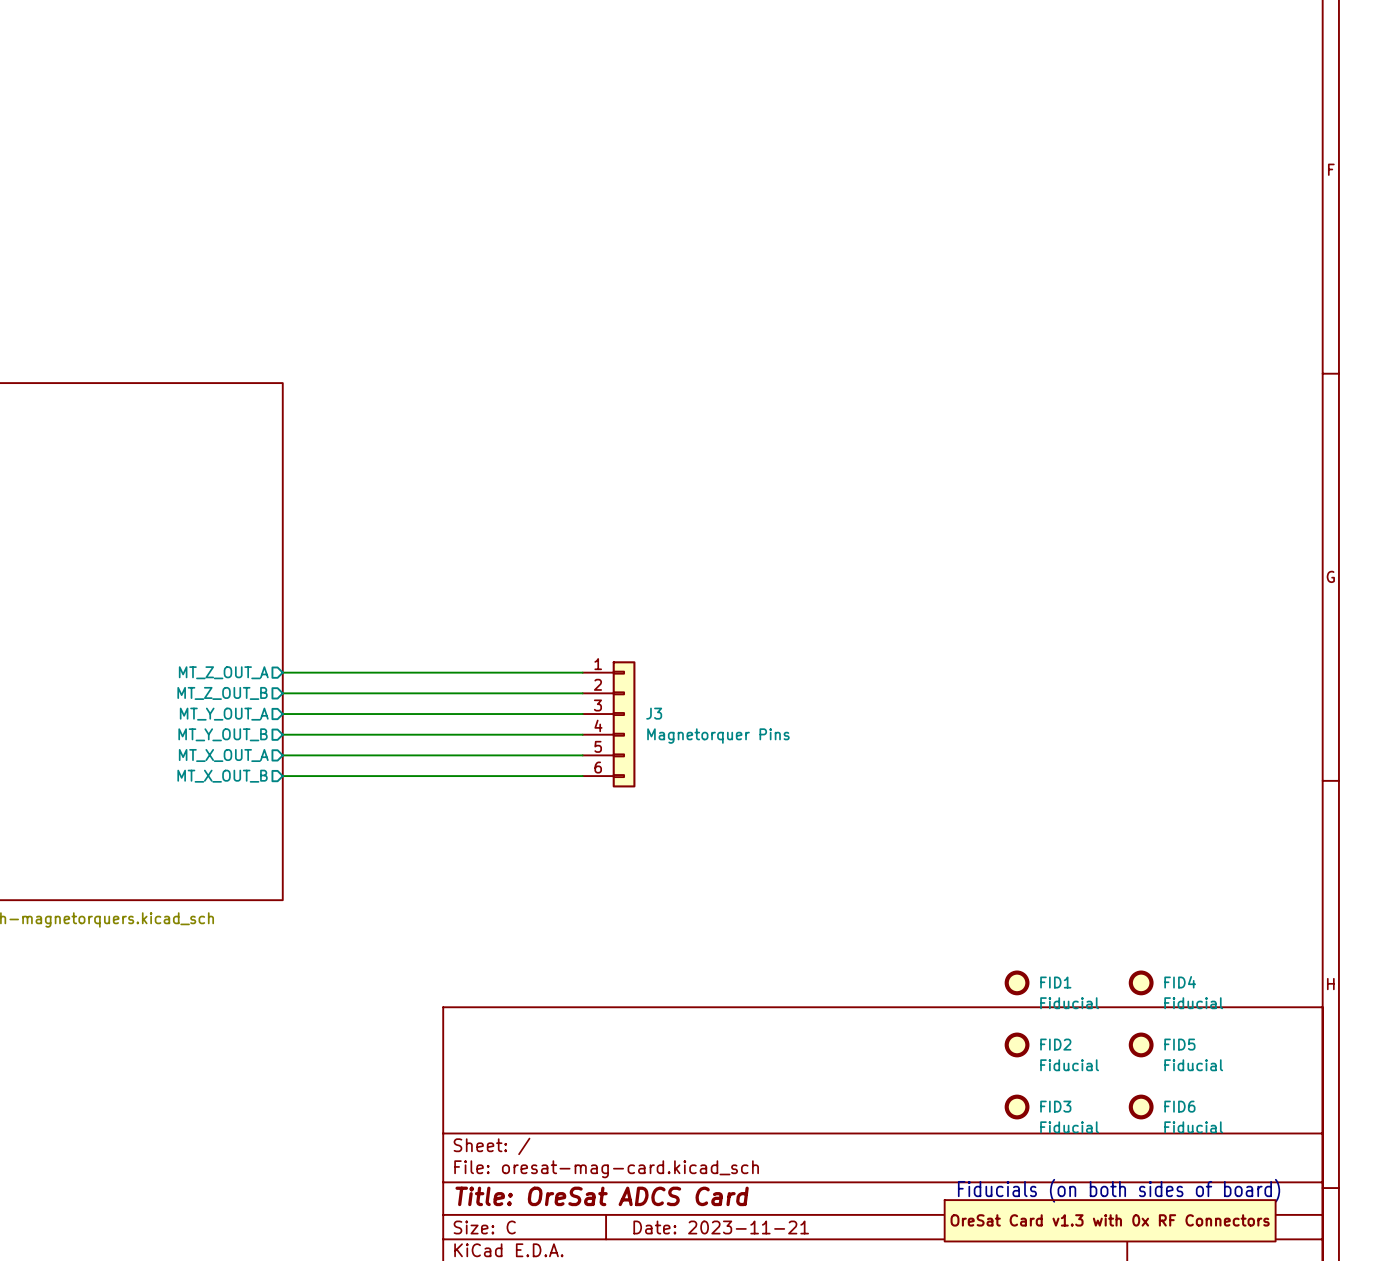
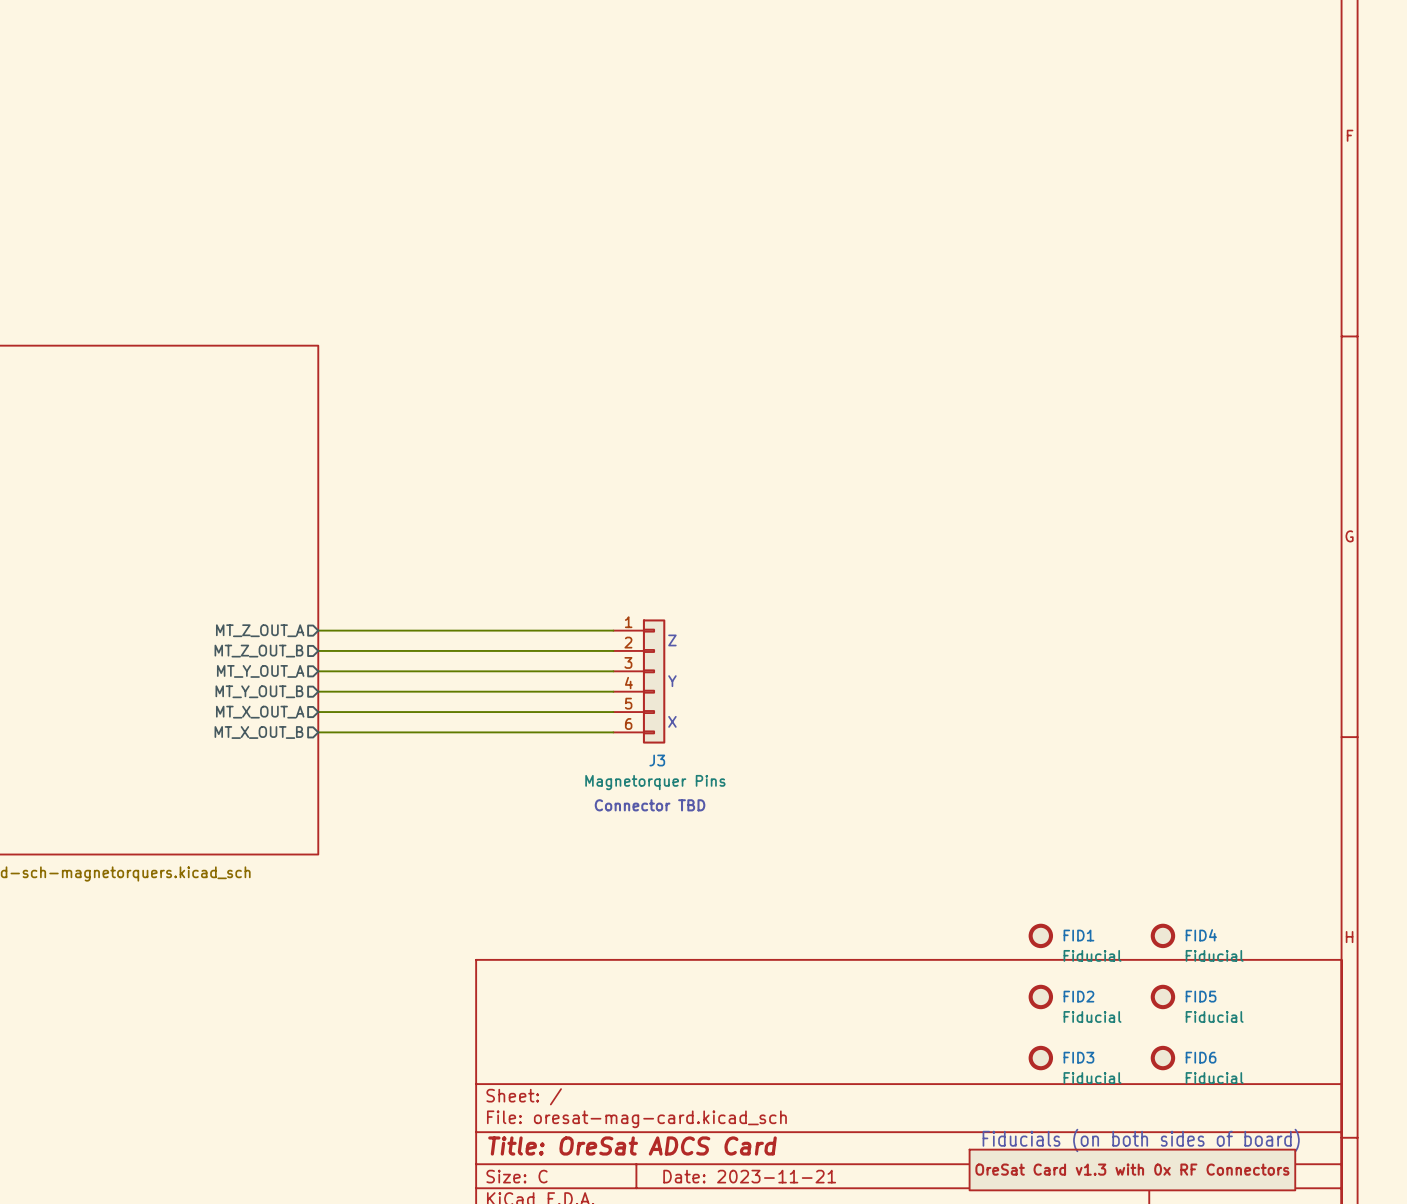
text: none -> Z (672, 640)
J3 name position: J3 (654, 713) -> J3 (657, 760)
text: none -> Y (672, 681)
J3 value position: Magnetorquer Pins (718, 736) -> Magnetorquer Pins (655, 782)
text: none -> X (672, 721)
text: none -> Connector TBD (650, 805)

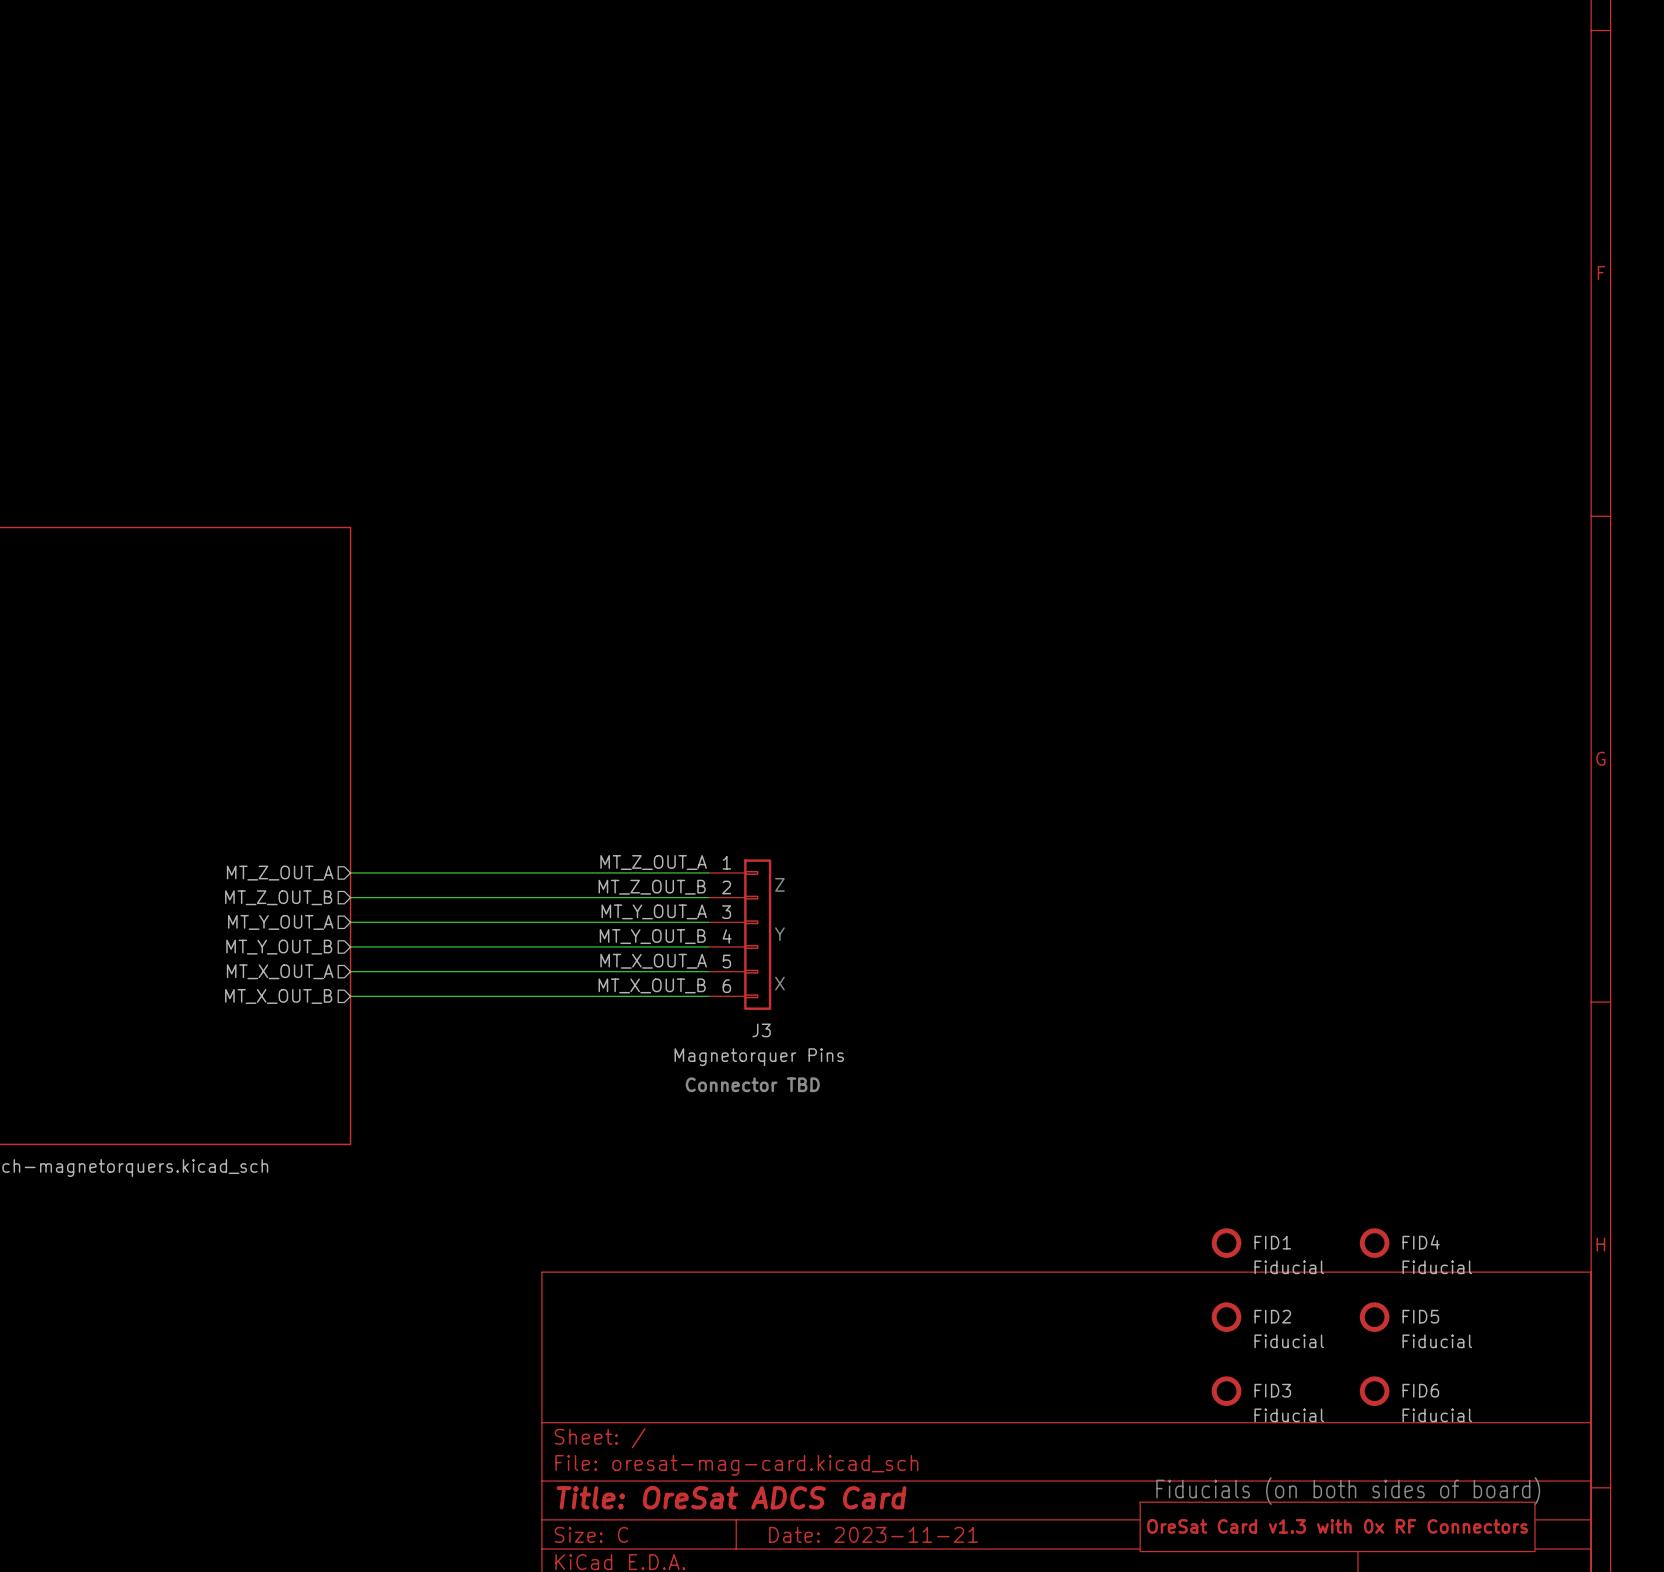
label: none -> MT_Z_OUT_A (653, 862)
label: none -> MT_Z_OUT_B (652, 887)
label: none -> MT_Y_OUT_A (654, 911)
label: none -> MT_Y_OUT_B (652, 936)
label: none -> MT_X_OUT_A (653, 961)
label: none -> MT_X_OUT_B (652, 985)

